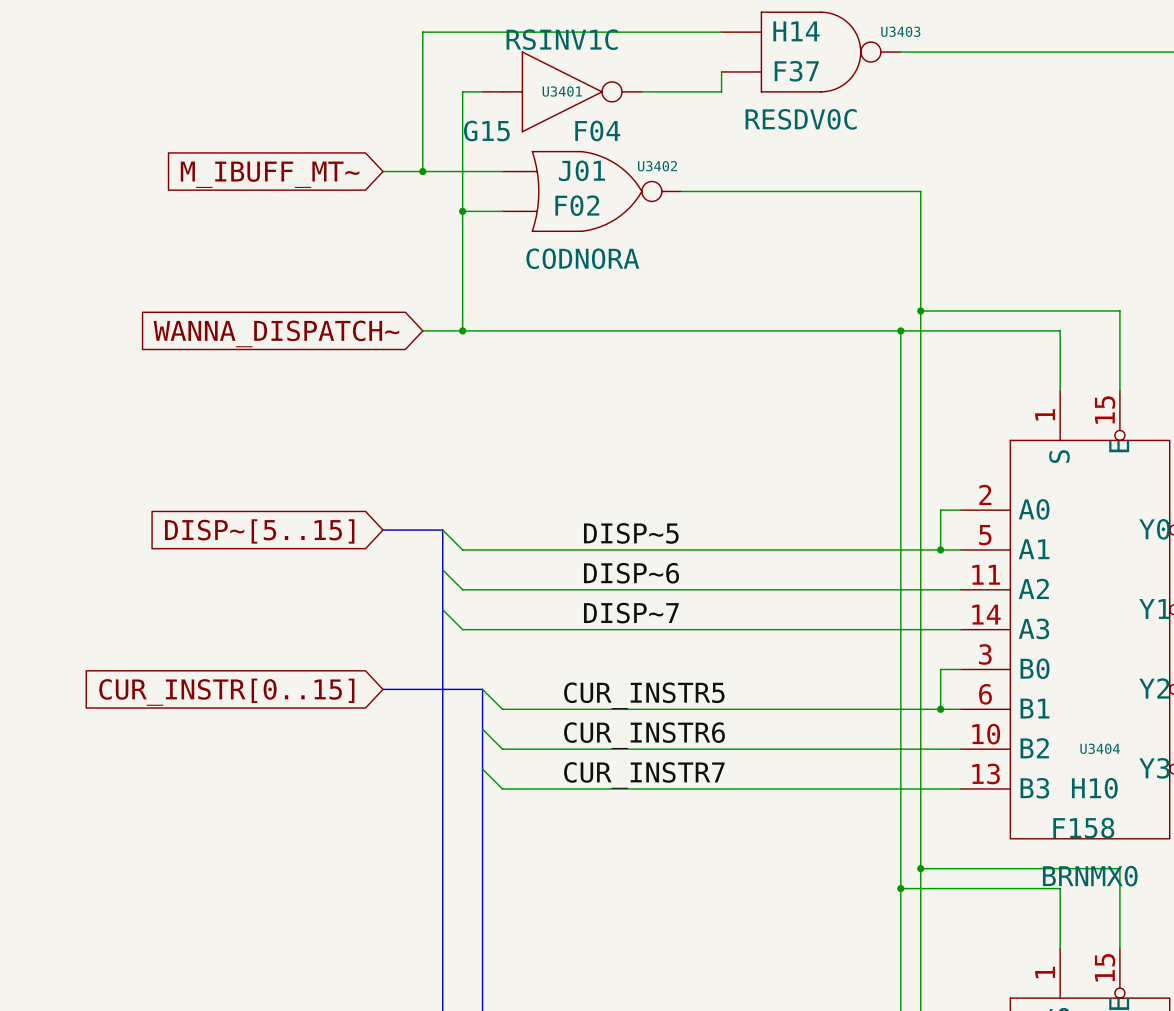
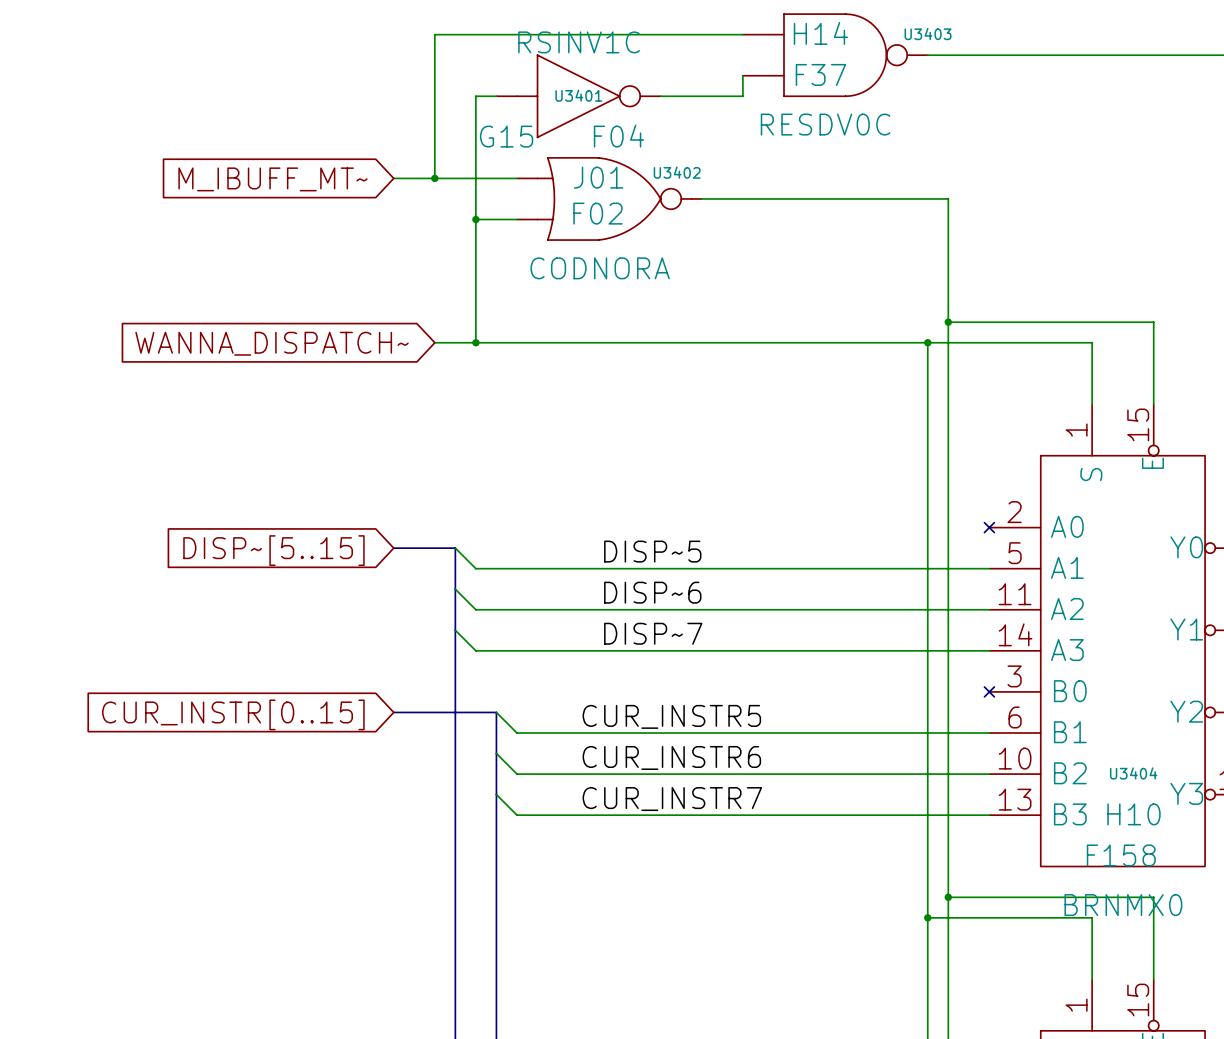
wire: (960, 510) (940, 510) (940, 549) -> none
no-connect mark: none -> (989, 527)
junction: (940, 549) -> none
wire: (960, 669) (940, 669) (940, 709) -> none
no-connect mark: none -> (989, 691)
junction: (940, 709) -> none

